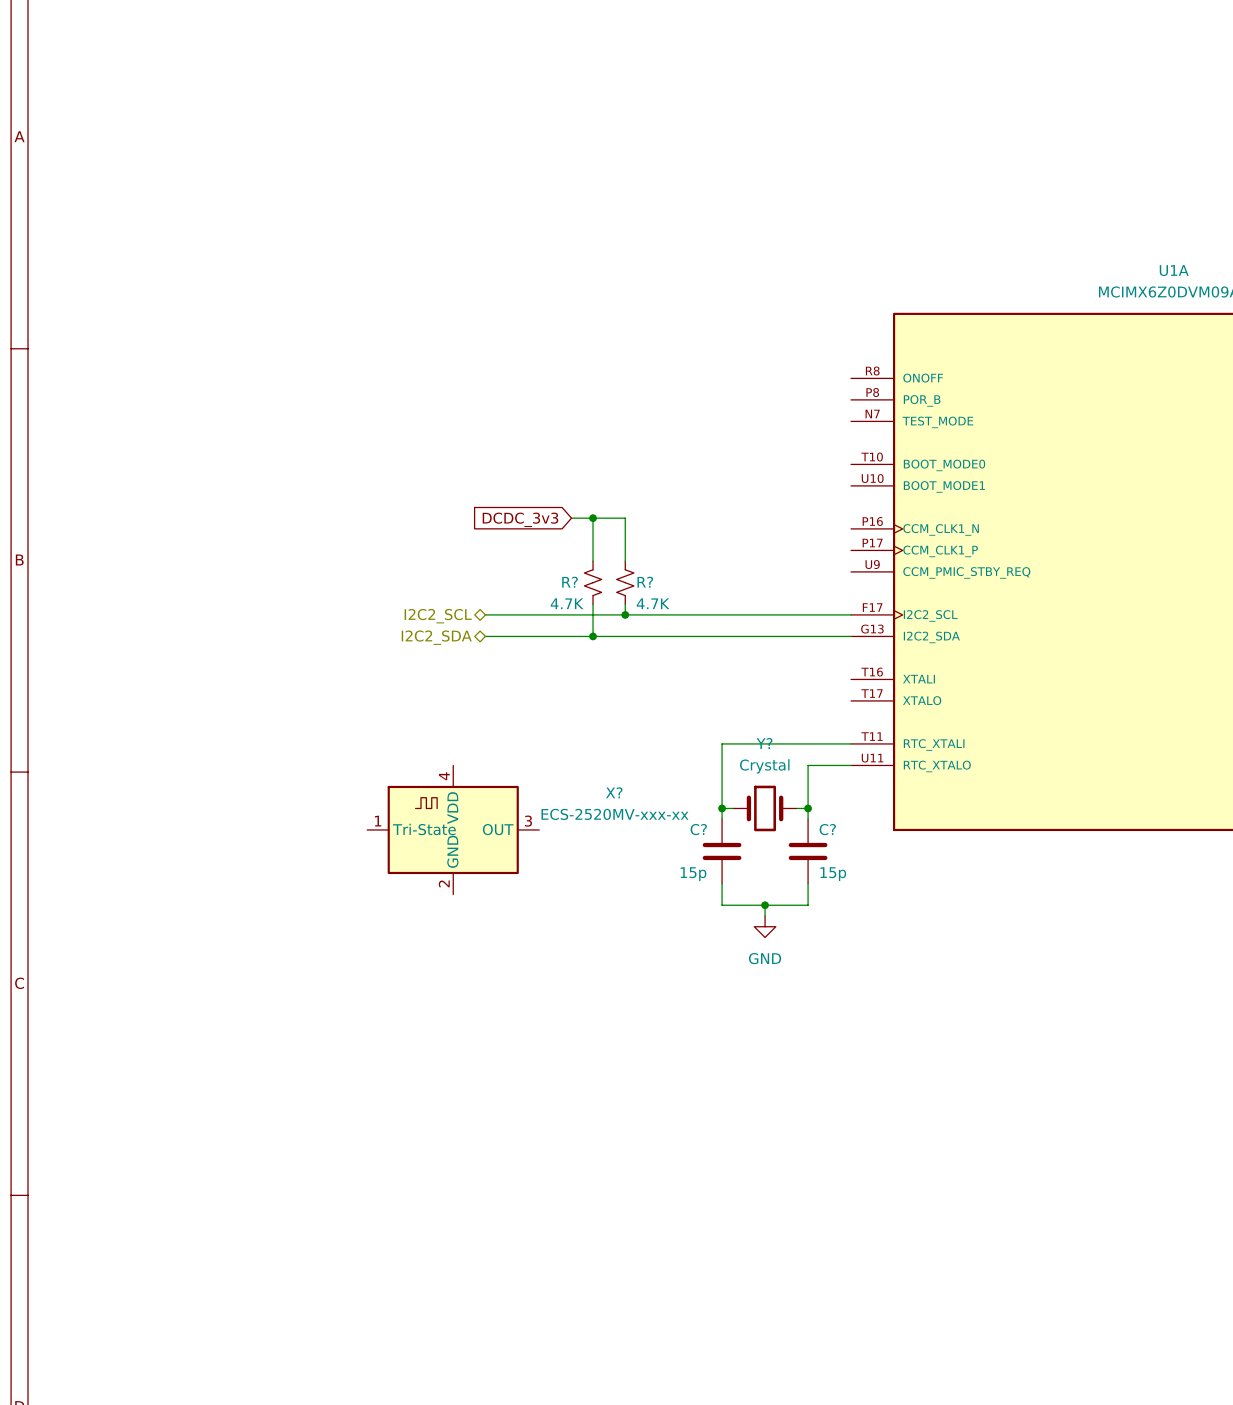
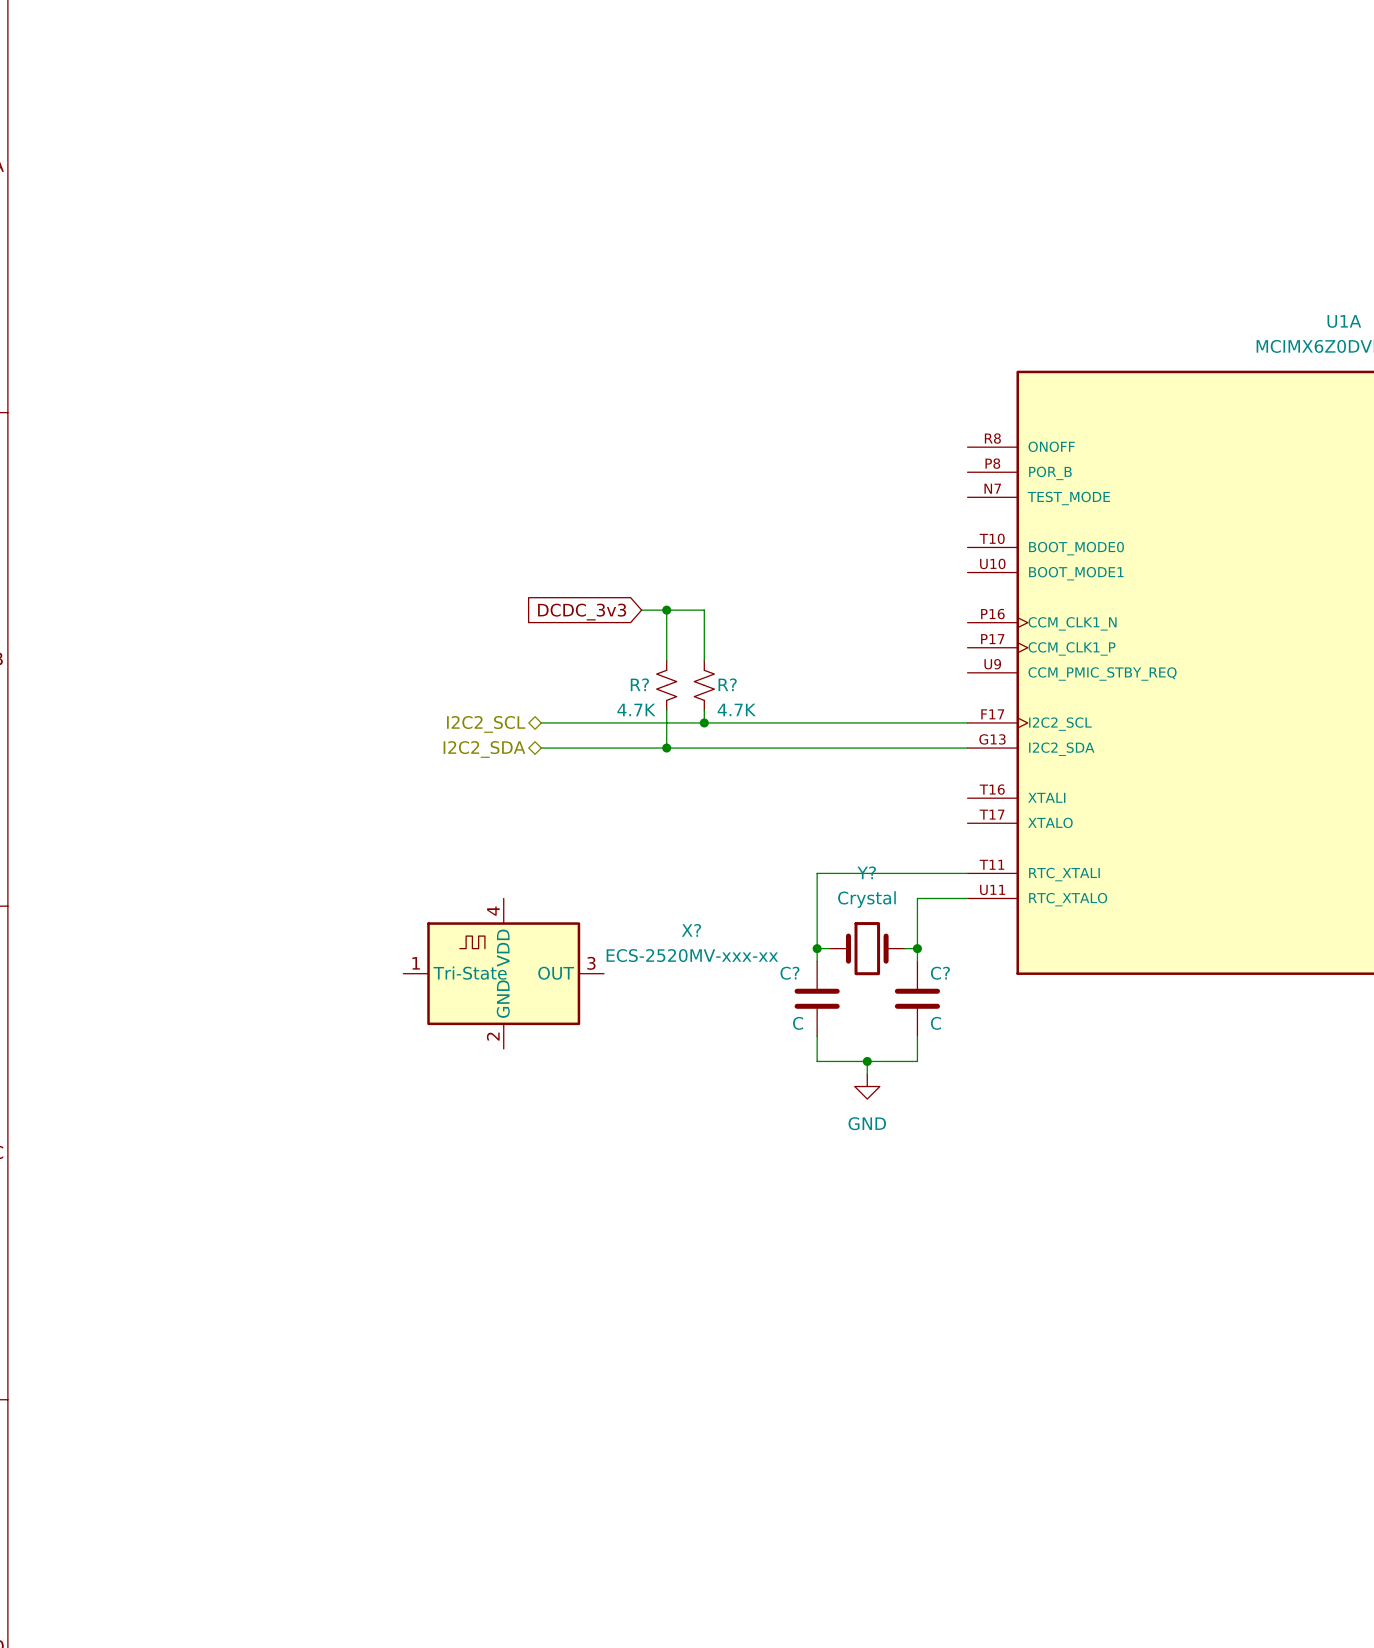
C? value: 15p (693, 874) -> C (798, 1023)
C? value: 15p (833, 874) -> C (935, 1023)

